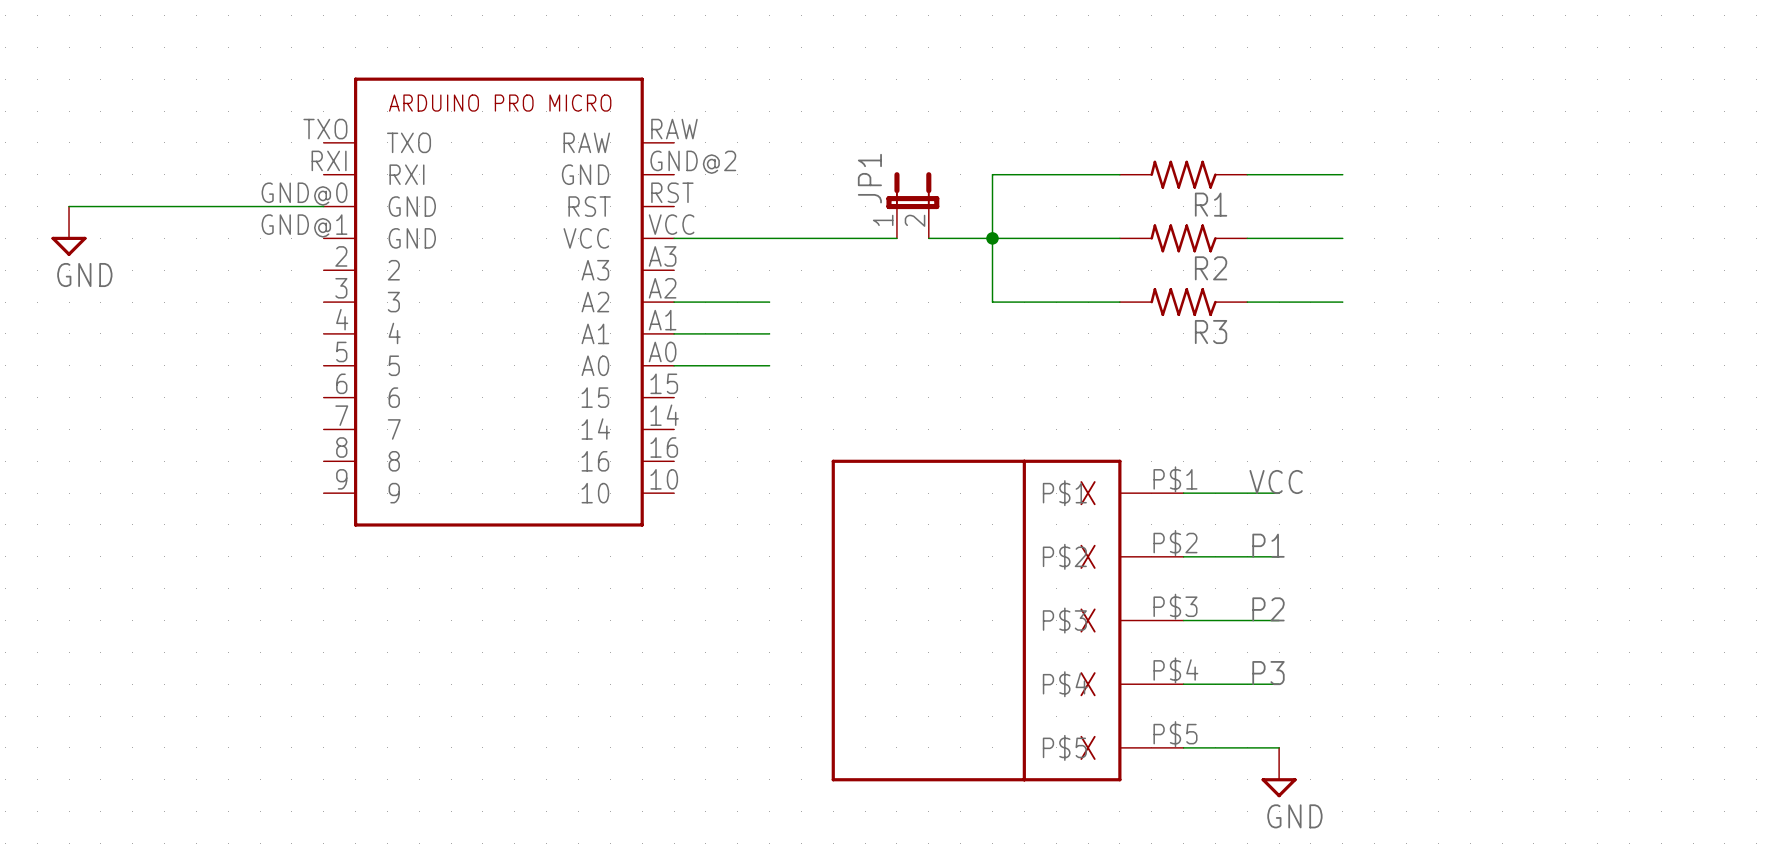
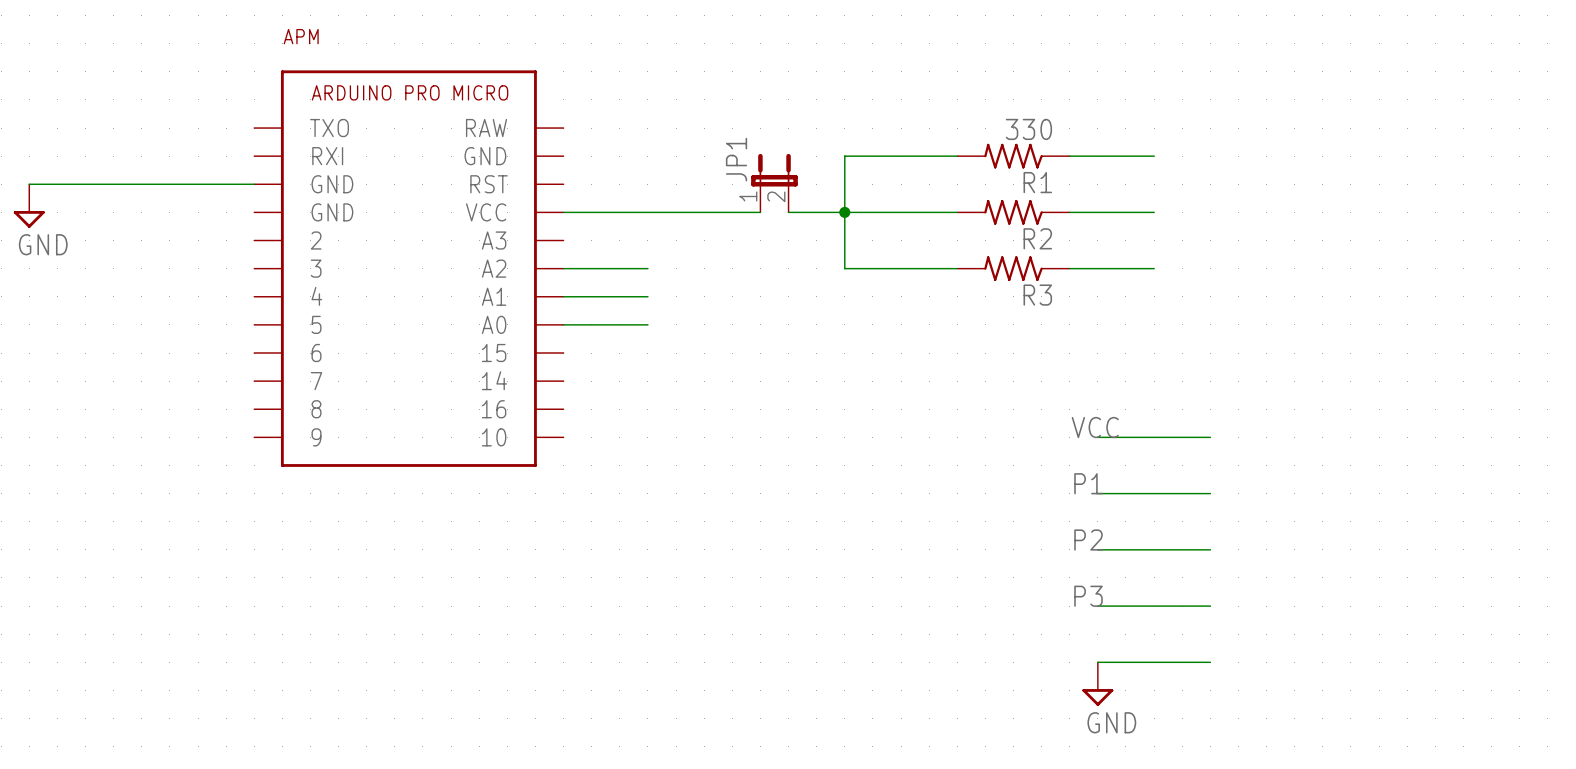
APM name: none -> APM (301, 36)
APM symbol: [323, 77, 675, 527] -> [254, 70, 564, 467]
R1 value: none -> 330 (1028, 129)
wire: (1183, 493) (1279, 493) -> (1210, 437) (1097, 437)
wire: (1183, 556) (1279, 556) -> (1210, 493) (1097, 493)
part: (1007, 620) -> none
wire: (1183, 620) (1279, 620) -> (1210, 549) (1097, 549)
wire: (1183, 684) (1279, 684) -> (1210, 606) (1097, 606)
wire: (1183, 747) (1279, 747) -> (1210, 662) (1097, 662)

